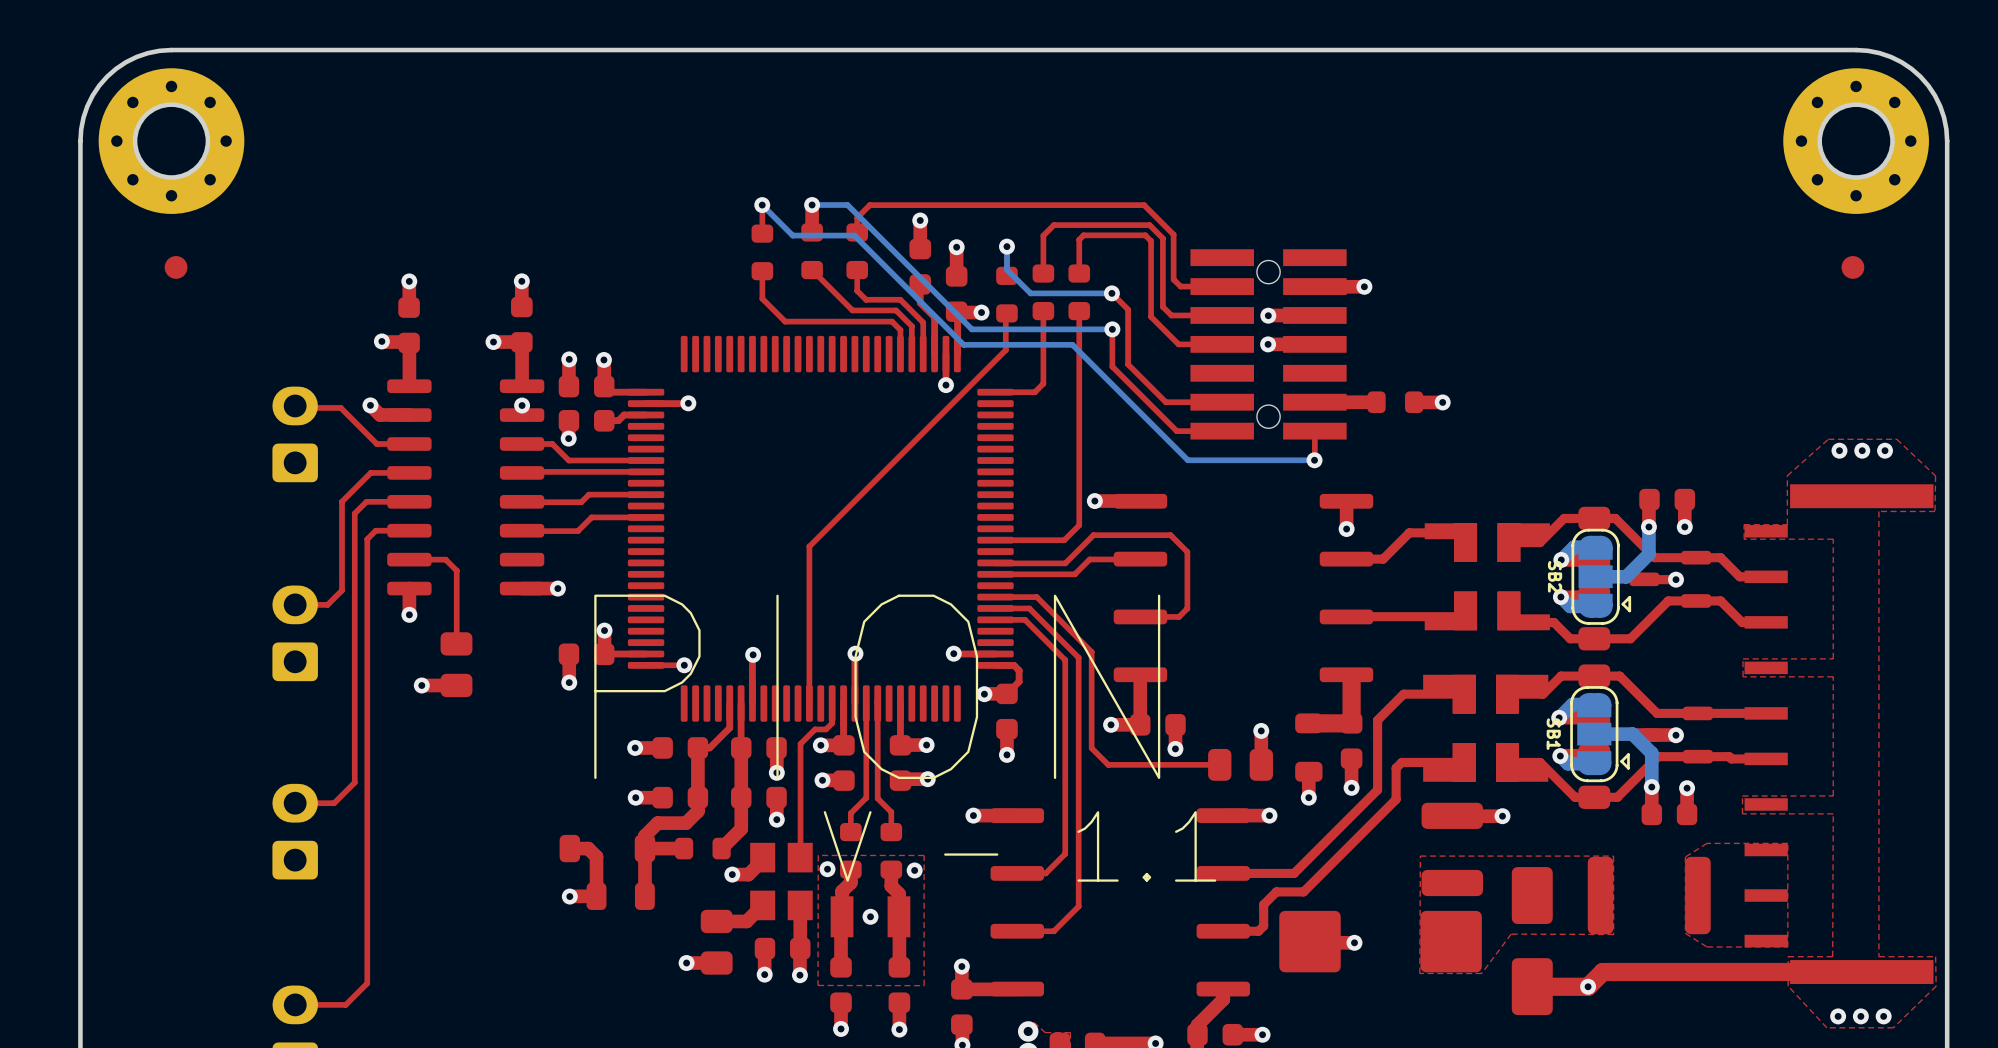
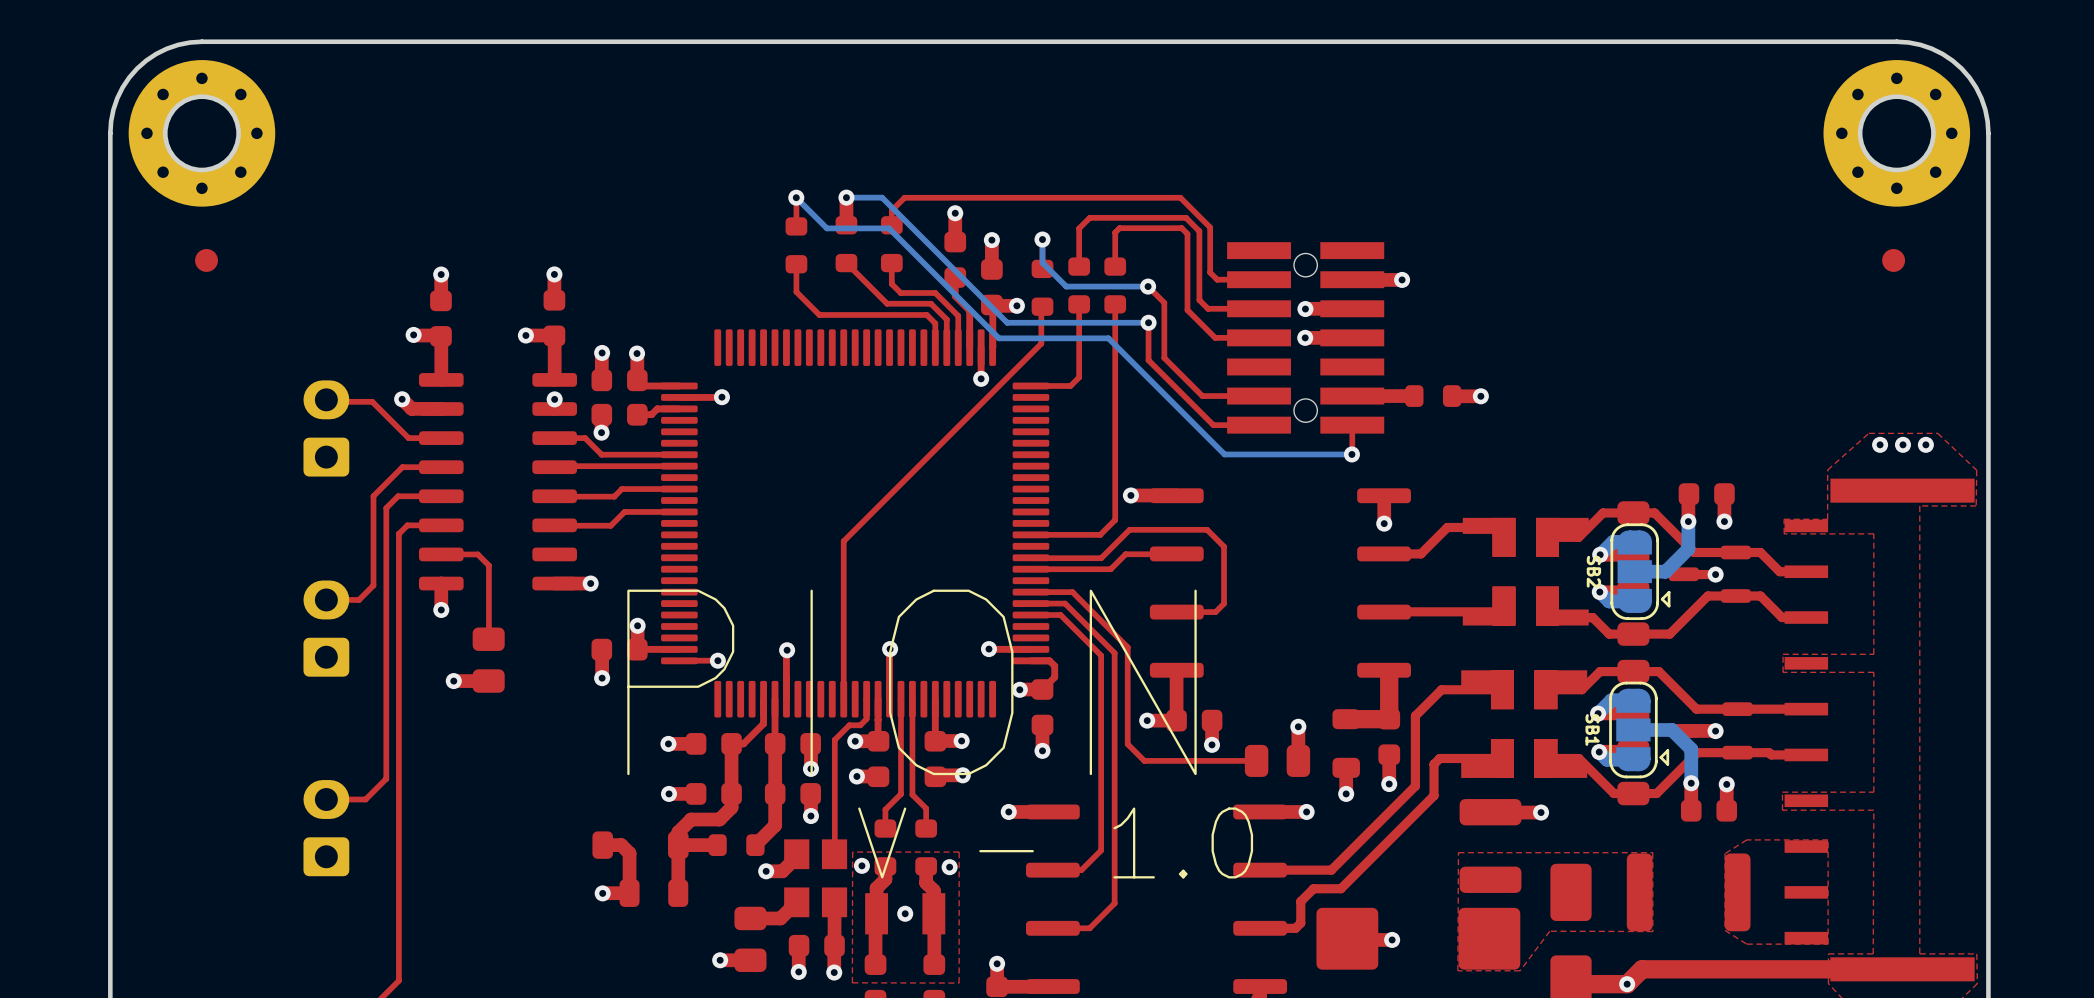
text: V - 1.1 (1020, 846) -> V - 1.0 (1055, 842)

